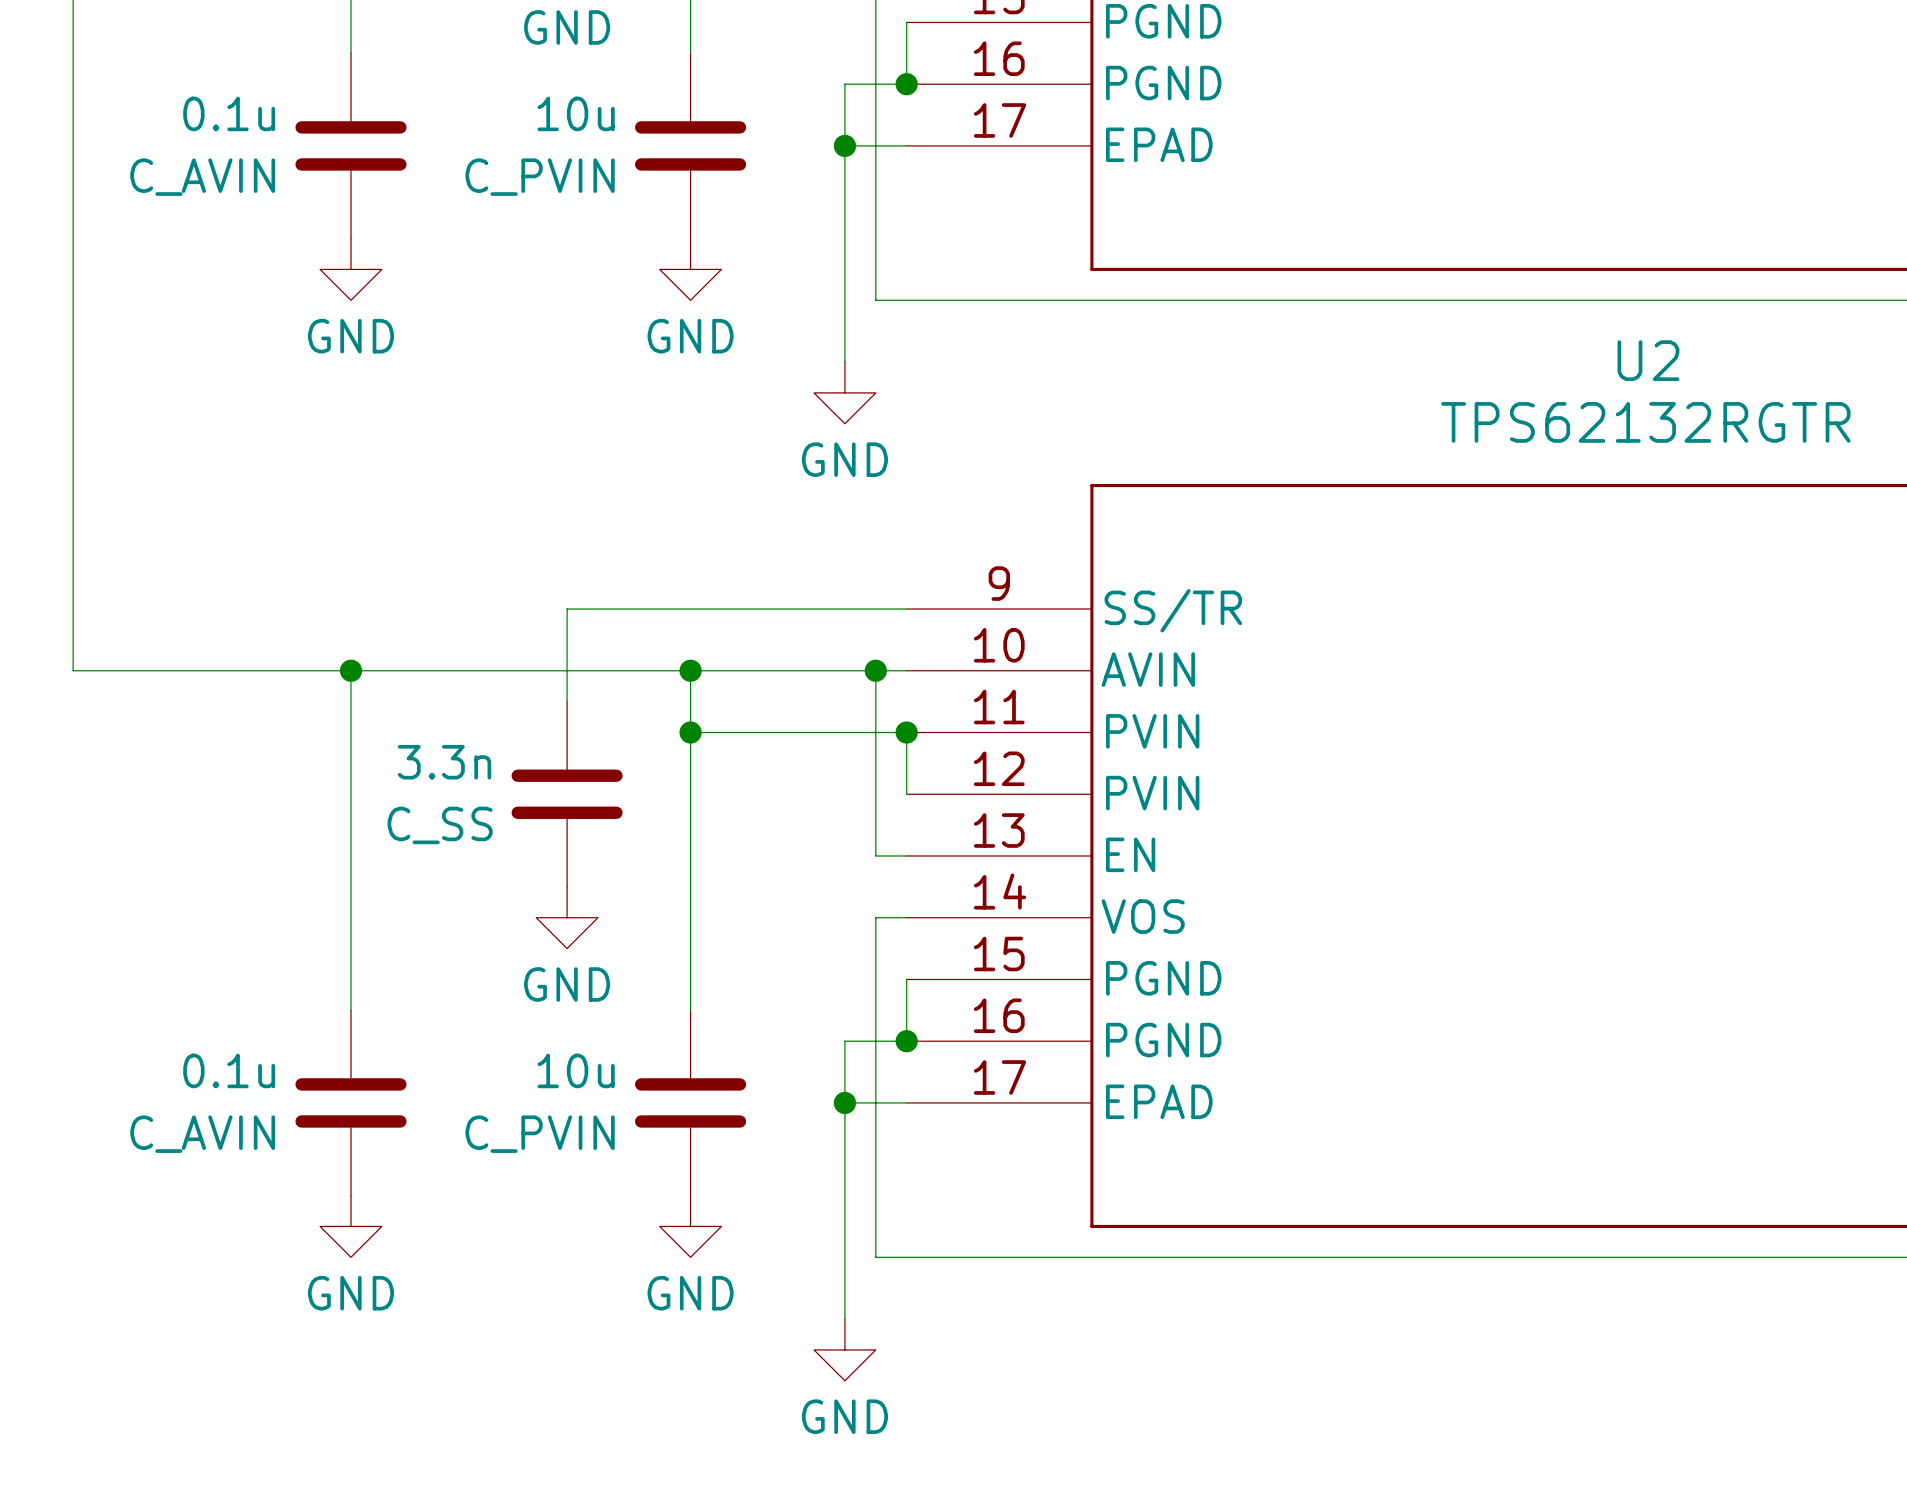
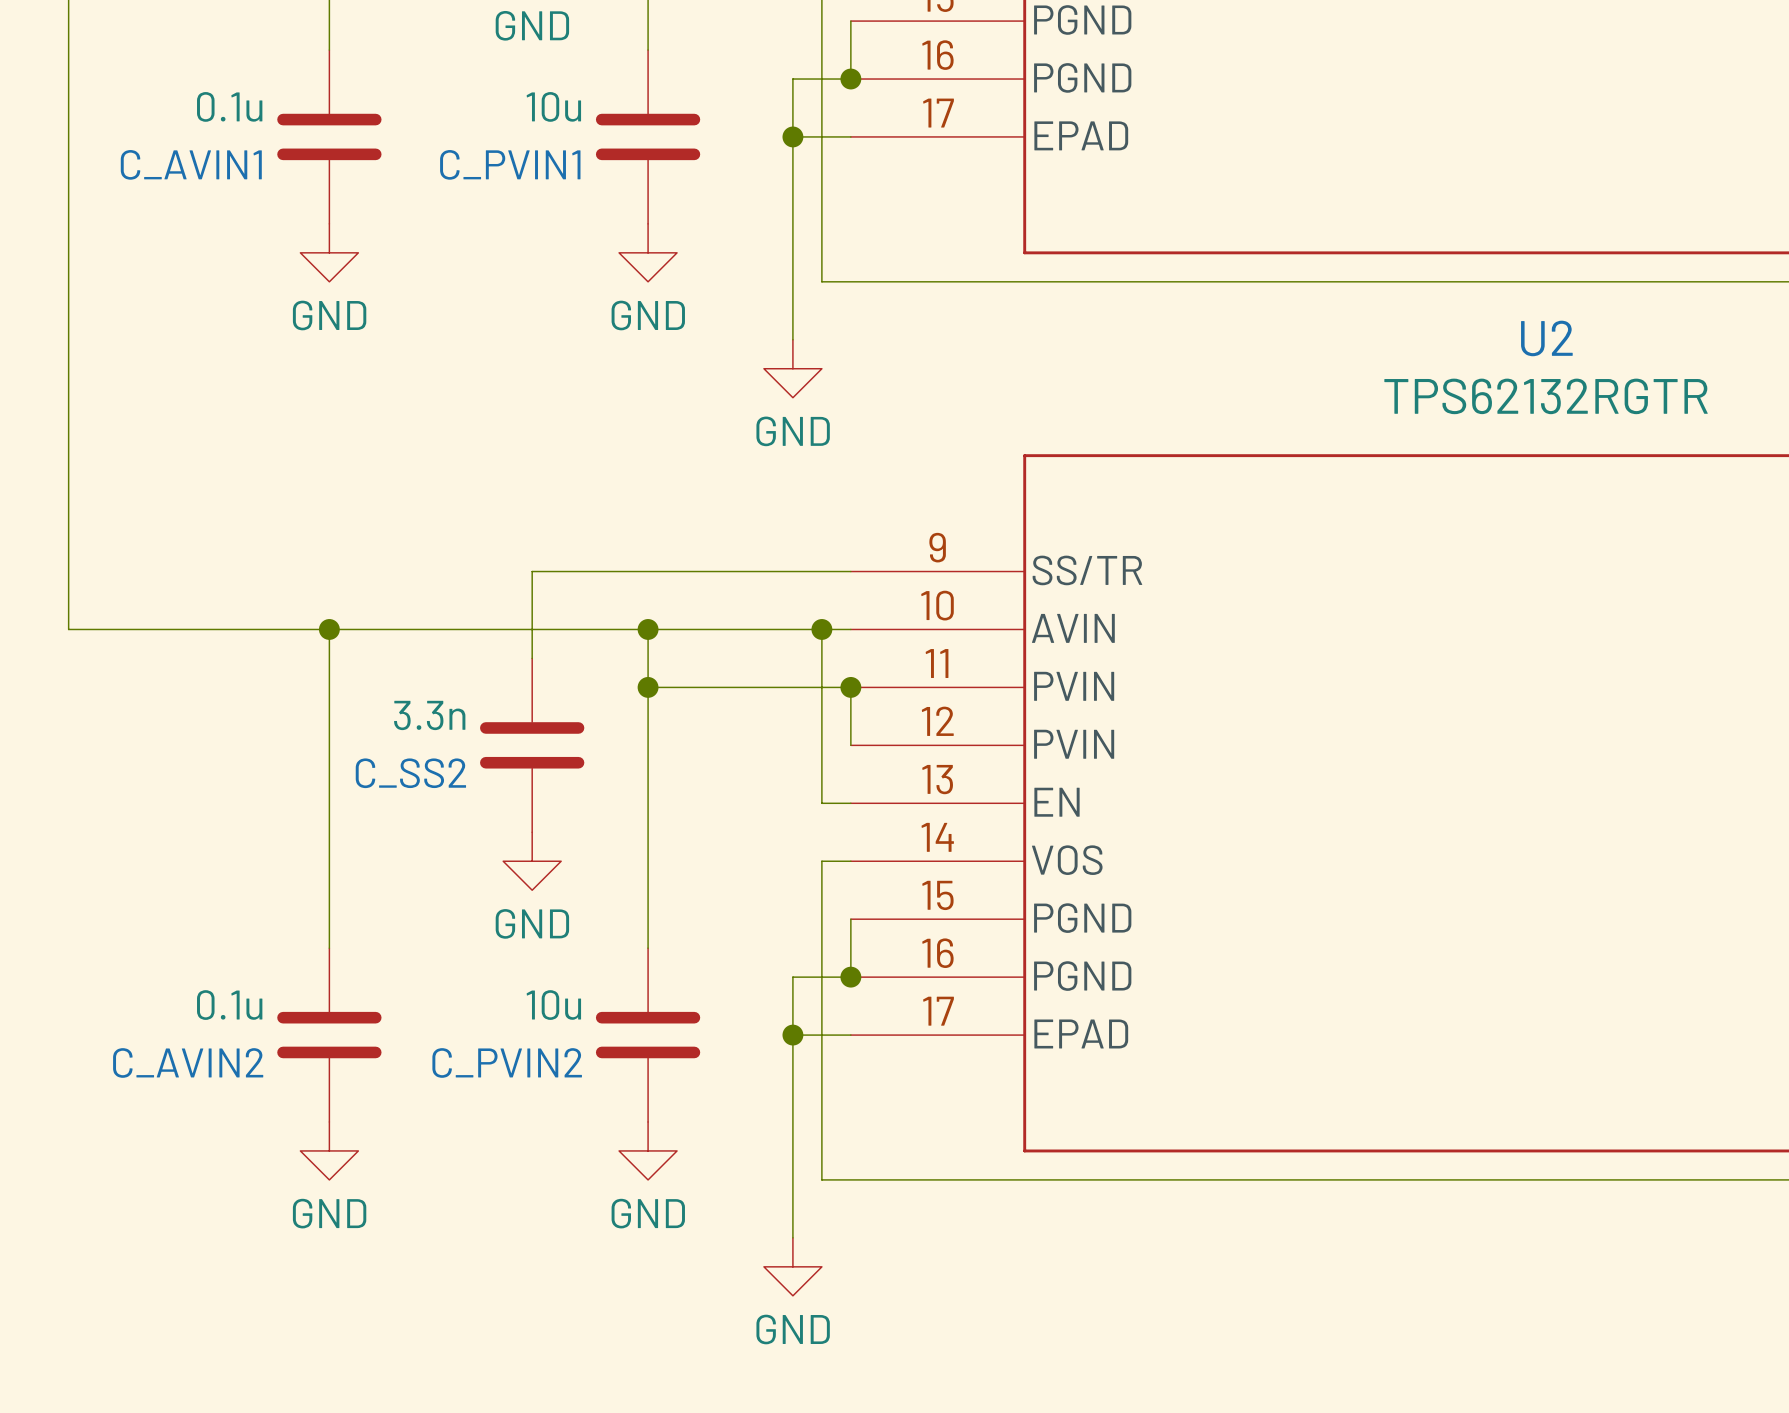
C_AVIN name: C_AVIN (202, 177) -> C_AVIN1 (191, 164)
C_PVIN name: C_PVIN (540, 177) -> C_PVIN1 (510, 164)
C_SS name: C_SS (440, 825) -> C_SS2 (410, 773)
C_AVIN name: C_AVIN (202, 1134) -> C_AVIN2 (188, 1062)
C_PVIN name: C_PVIN (540, 1134) -> C_PVIN2 (507, 1062)

